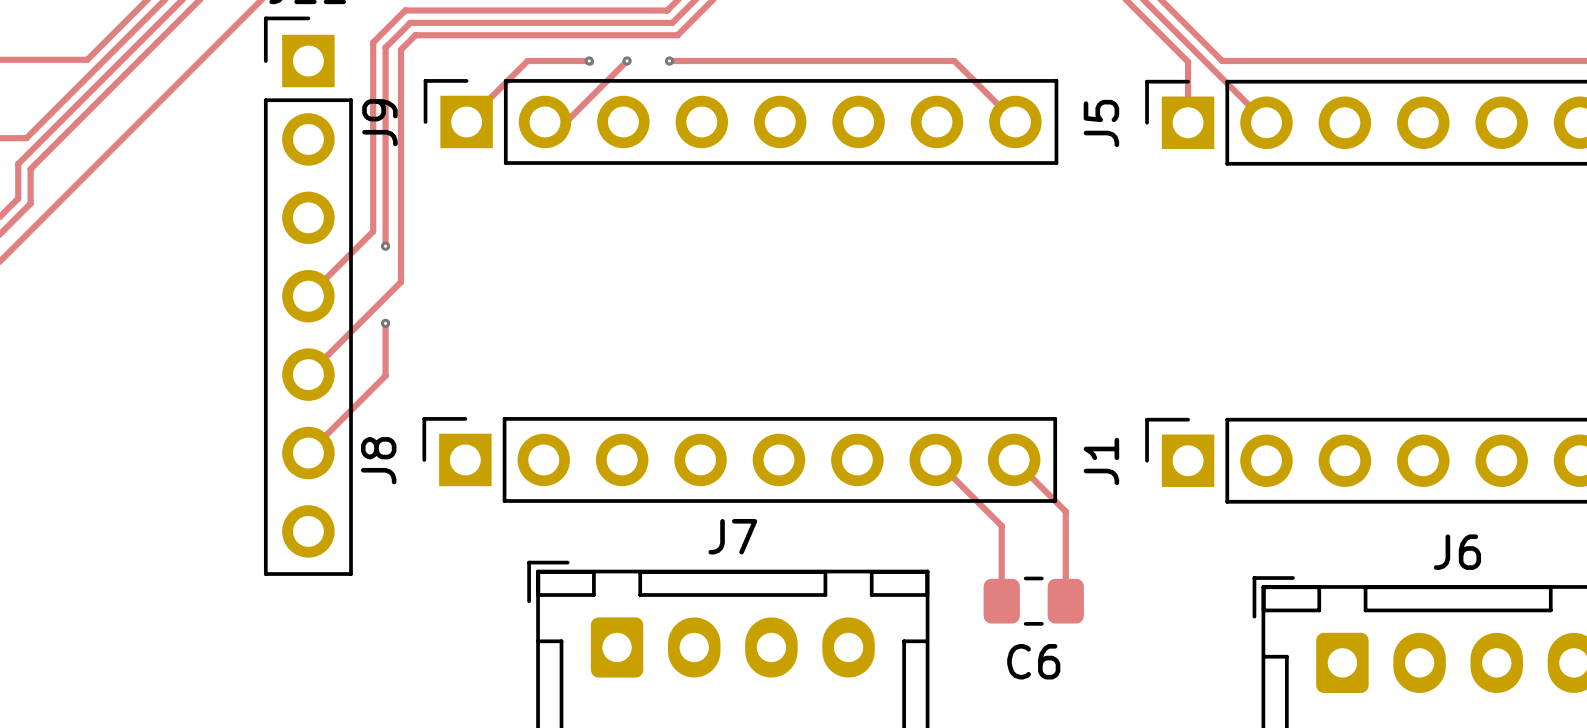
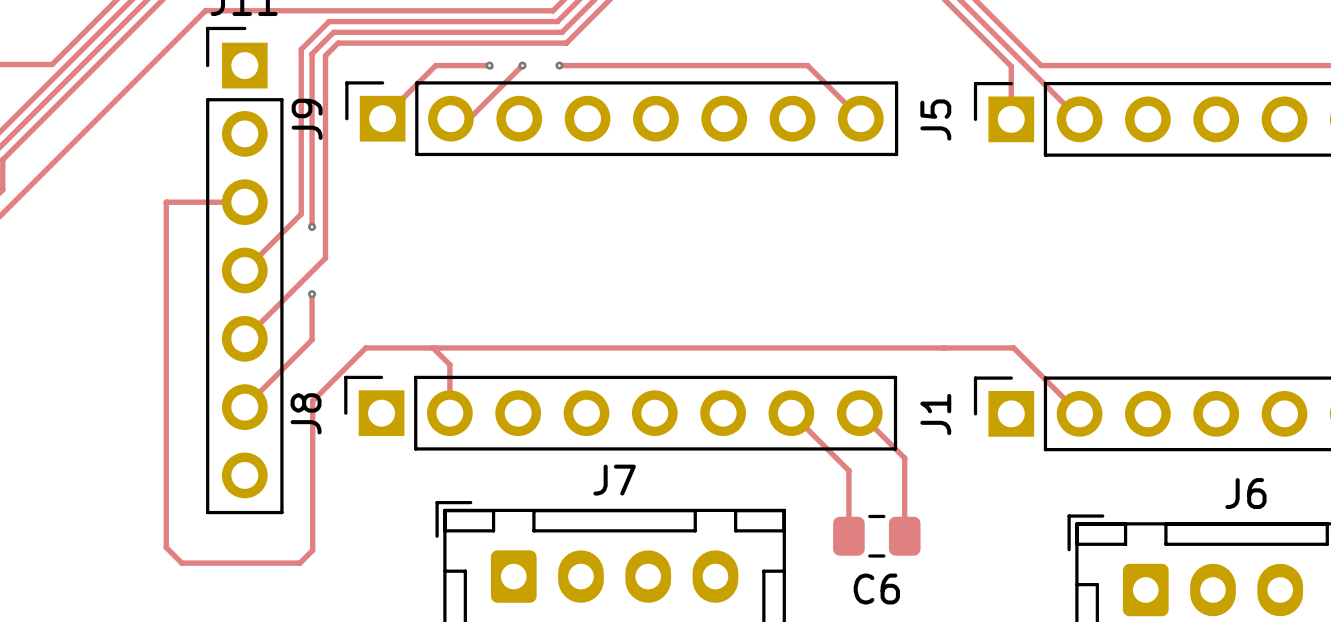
track: none -> (244, 202) (166, 202) (166, 547) (181, 563) (299, 563) (312, 550) (312, 401) (365, 347) (1013, 347) (1079, 413)
track: none -> (433, 347) (449, 364) (449, 413)

